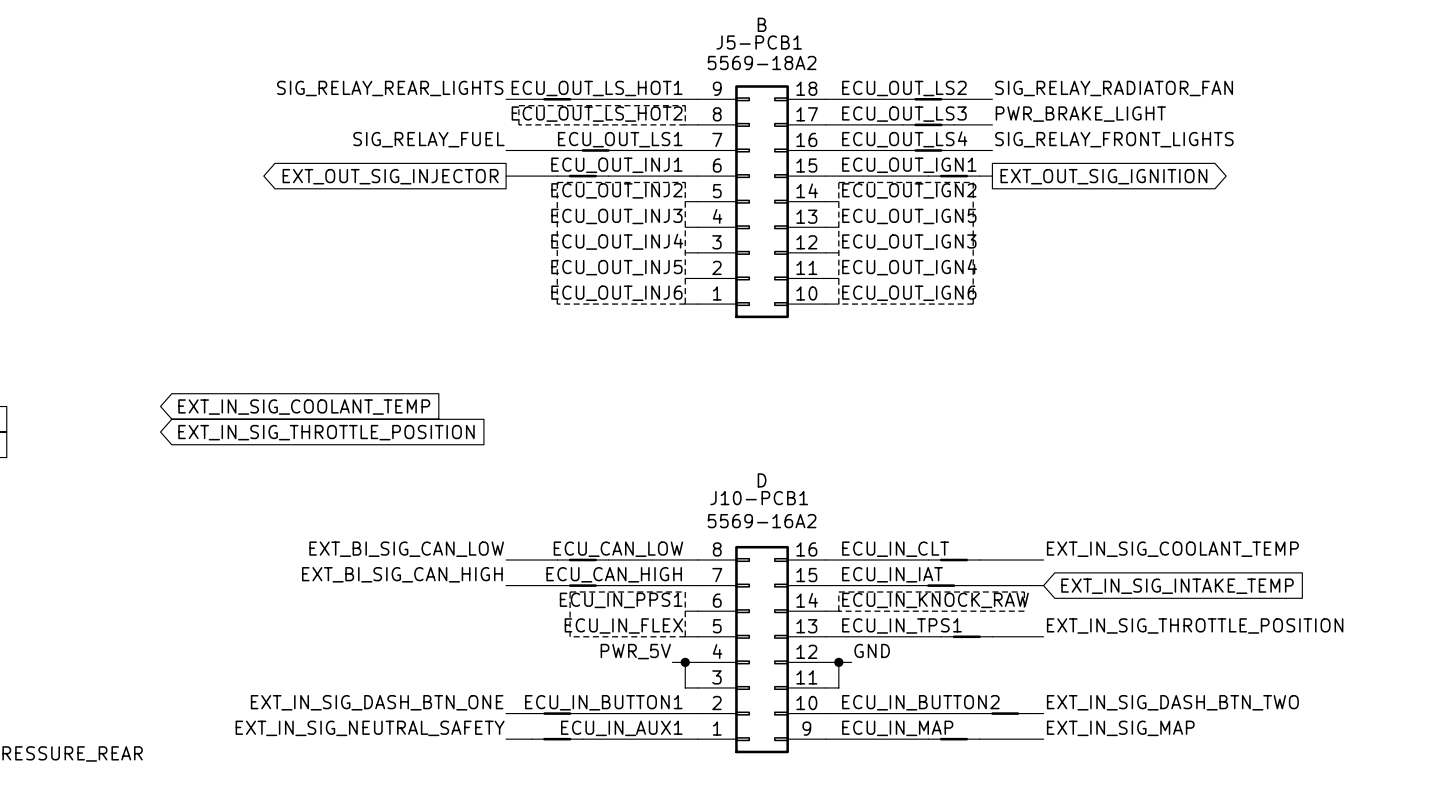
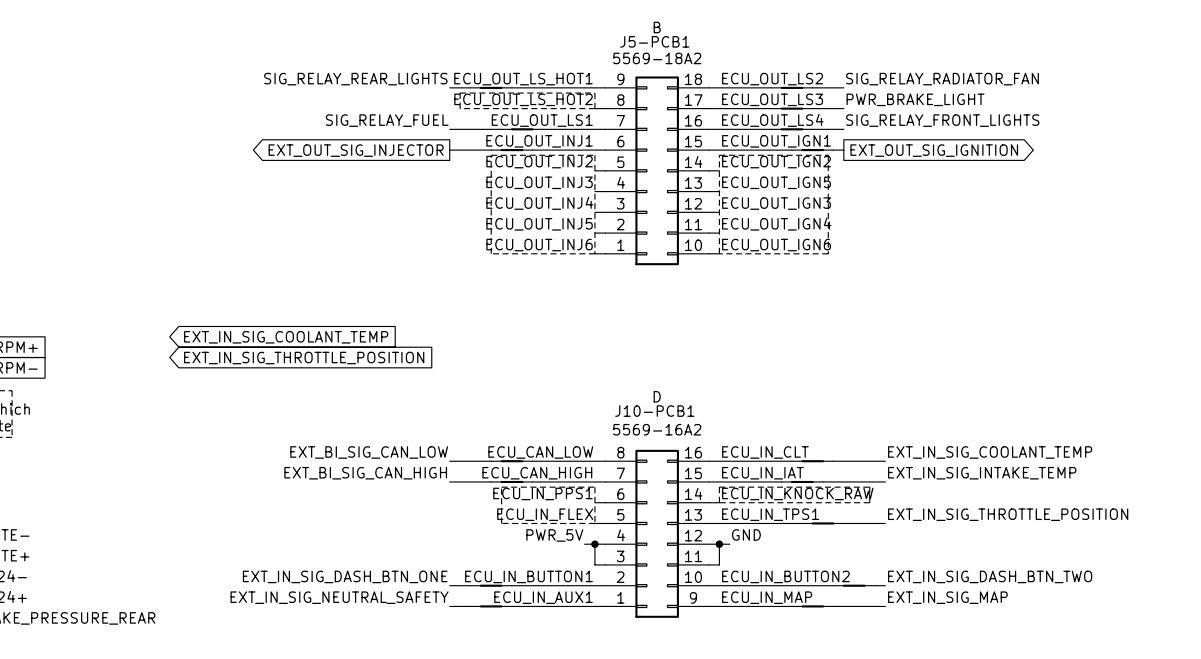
label: none -> EXT_IN_SIG_INTAKE_TEMP (982, 473)
global label: EXT_IN_SIG_INTAKE_TEMP (1177, 586) -> none

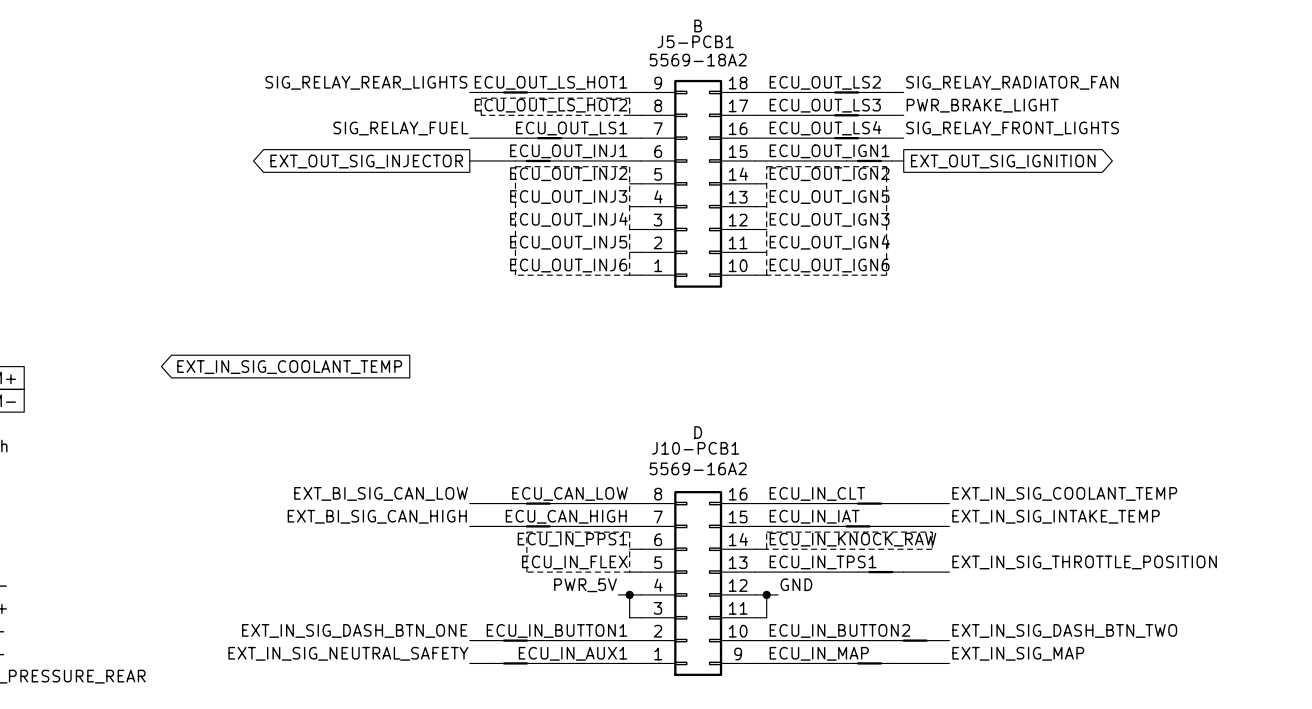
global label: EXT_IN_SIG_THROTTLE_POSITION (304, 358) -> none

